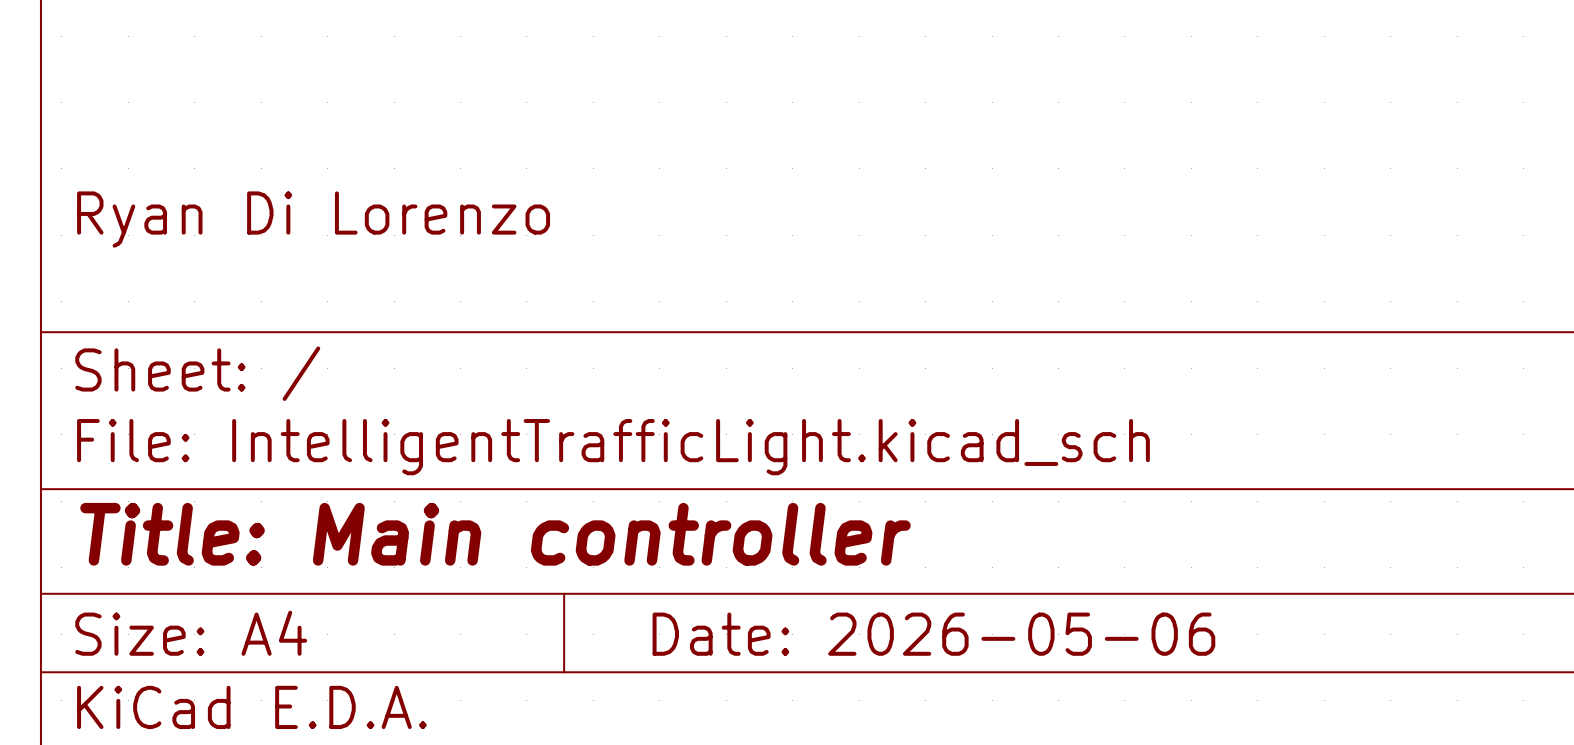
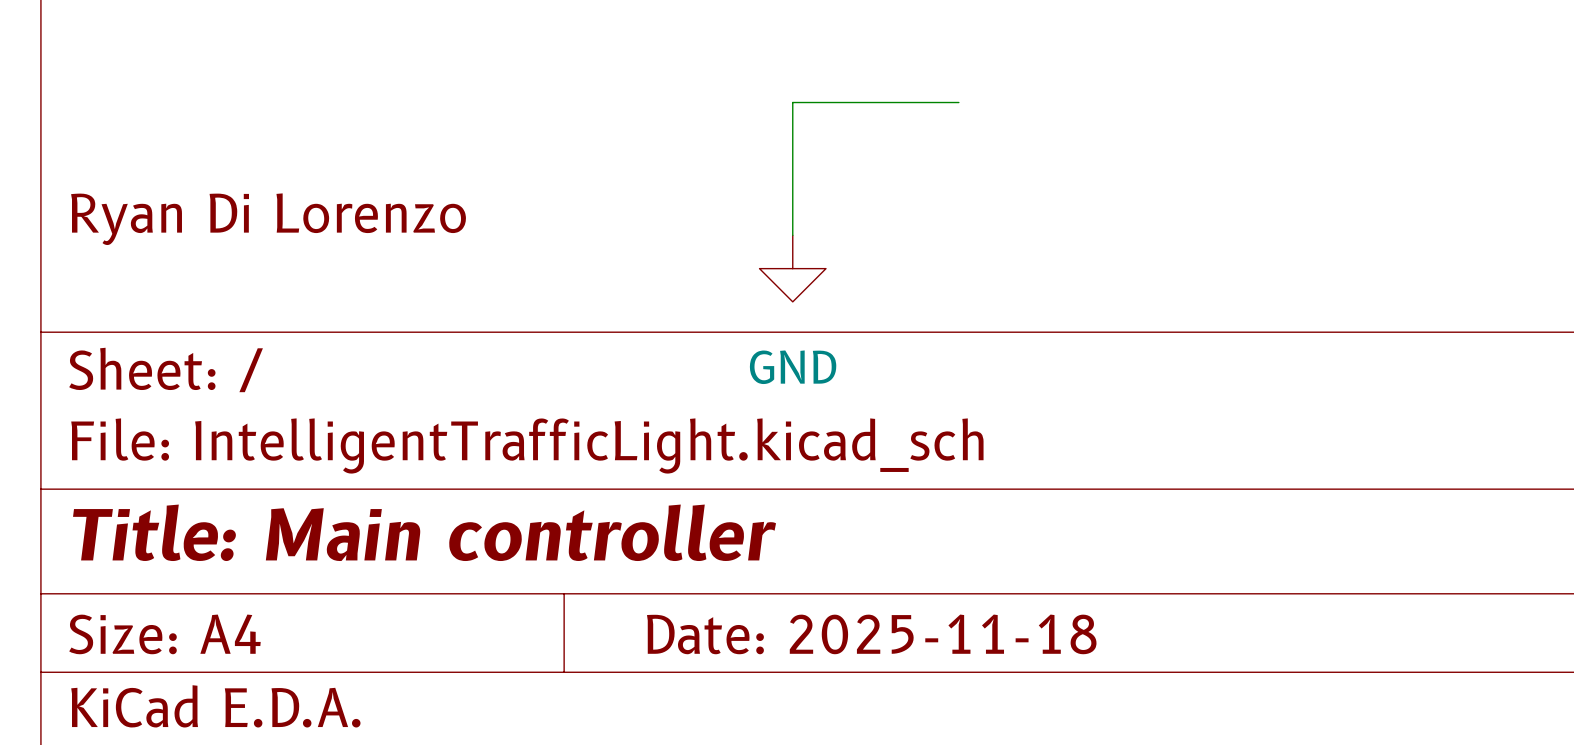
wire: none -> (958, 102) (792, 102) (792, 235)
power symbol: none -> GND (792, 268)
title block: Date: 2026-05-06 (933, 634) -> Date: 2025-11-18 (871, 634)

